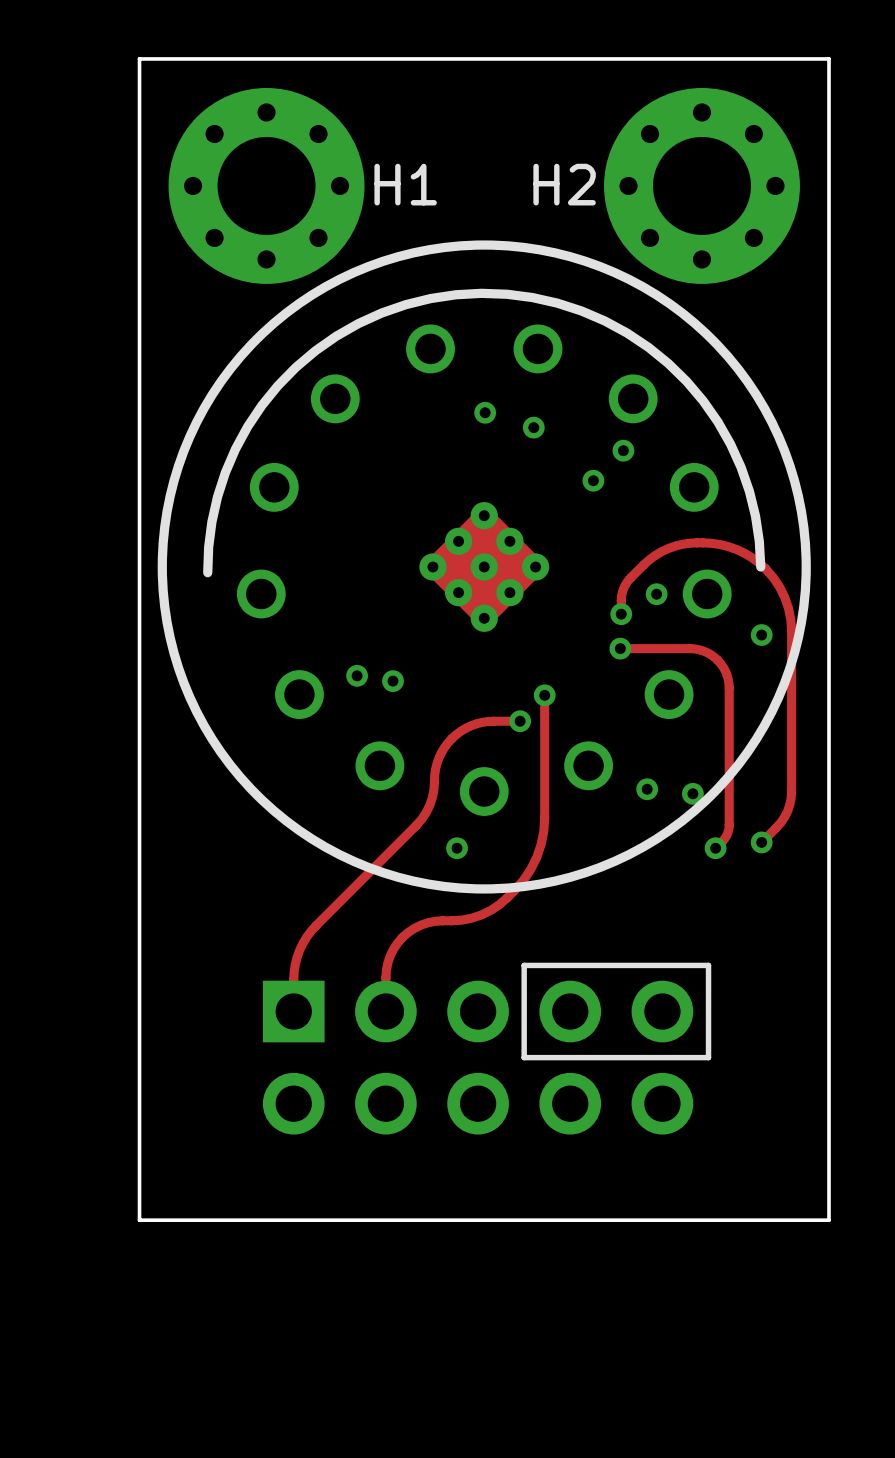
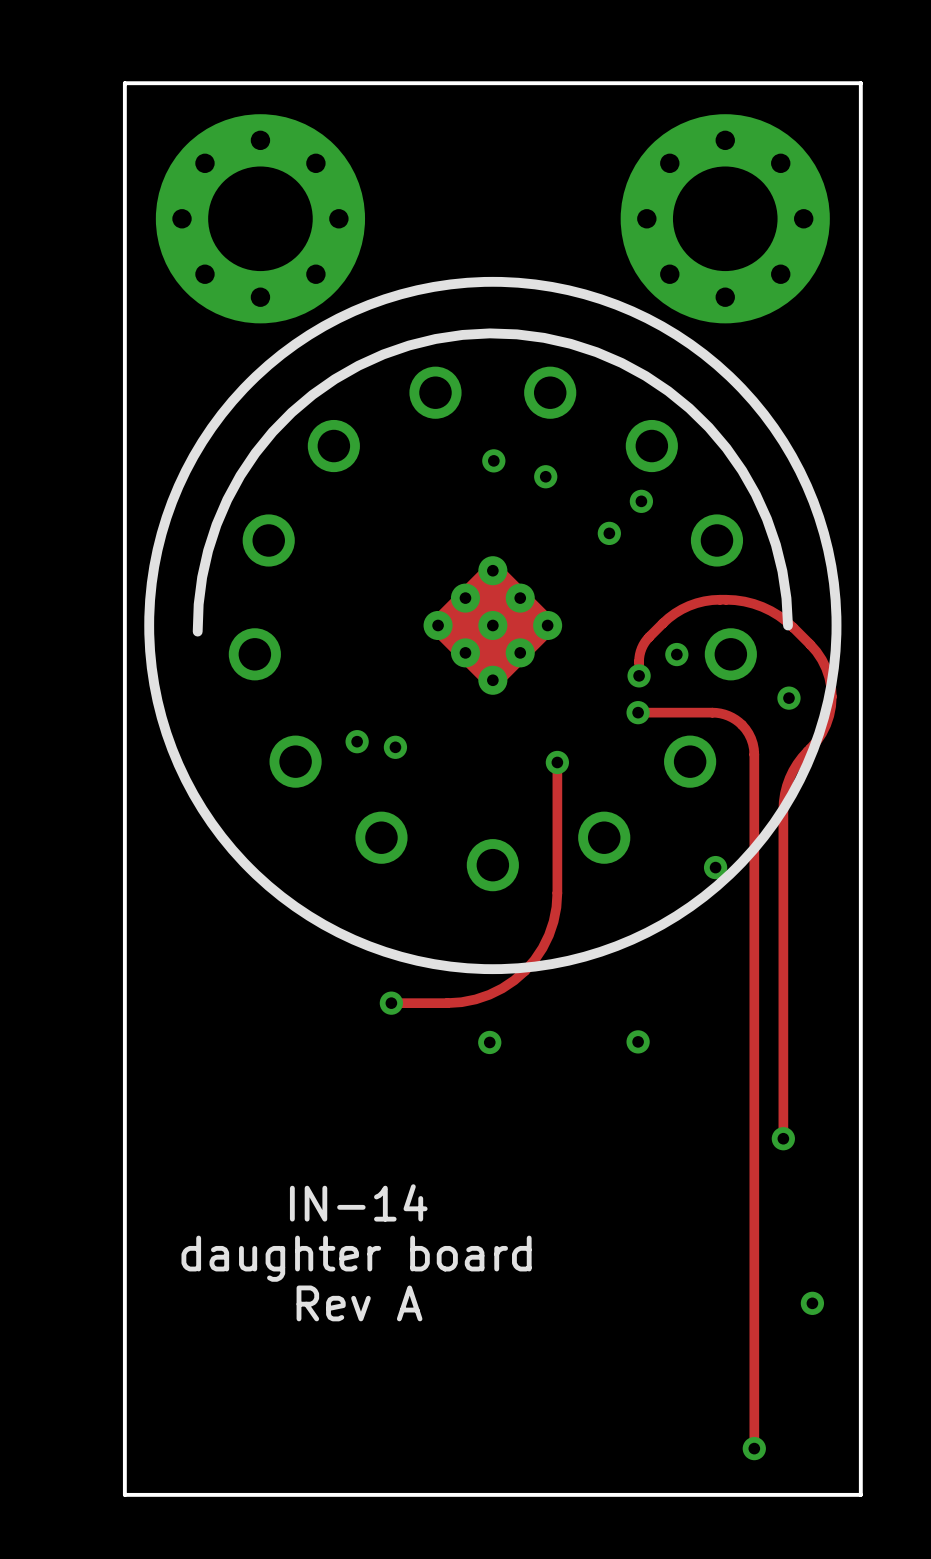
H1 name: H1 (405, 184) -> none
H2 name: H2 (564, 184) -> none
track: (702, 542) (720, 544) (736, 549) (759, 563) (779, 587) (784, 597) (790, 620) (791, 797) (784, 816) (761, 842) -> (725, 599) (753, 603) (770, 610) (786, 621) (816, 651) (826, 668) (831, 687) (831, 706) (826, 724) (816, 741) (793, 770) (786, 785) (783, 801) (783, 1138)
track: (520, 721) (488, 721) (476, 723) (460, 731) (447, 742) (437, 763) (432, 797) (421, 819) (316, 925) (302, 943) (294, 972) (293, 1011) -> none
via: (520, 721) -> none
via: (647, 789) -> none
track: (729, 824) (726, 836) (715, 848) -> (754, 900) (754, 1448)
via: (761, 842) -> none
via: (457, 848) -> none
via: (715, 848) -> none
track: (514, 890) (499, 904) (481, 914) (461, 920) (428, 922) (414, 928) (402, 937) (393, 949) (387, 962) (385, 1011) -> (525, 970) (502, 988) (475, 999) (447, 1003) (391, 1003)
via: none -> (391, 1003)
via: none -> (489, 1042)
via: none -> (638, 1041)
line: (524, 965) (708, 965) (708, 1057) (524, 1057) (524, 965) -> none
via: none -> (783, 1138)
part: (478, 1057) -> none
text: none -> IN-14 (358, 1202)
text: none -> daughter board (356, 1258)
text: none -> Rev A (359, 1303)
via: none -> (812, 1303)
board edge: (139, 1220) (829, 1220) -> (124, 1322) (124, 1494) (860, 1494) (860, 1322)
via: none -> (754, 1448)

